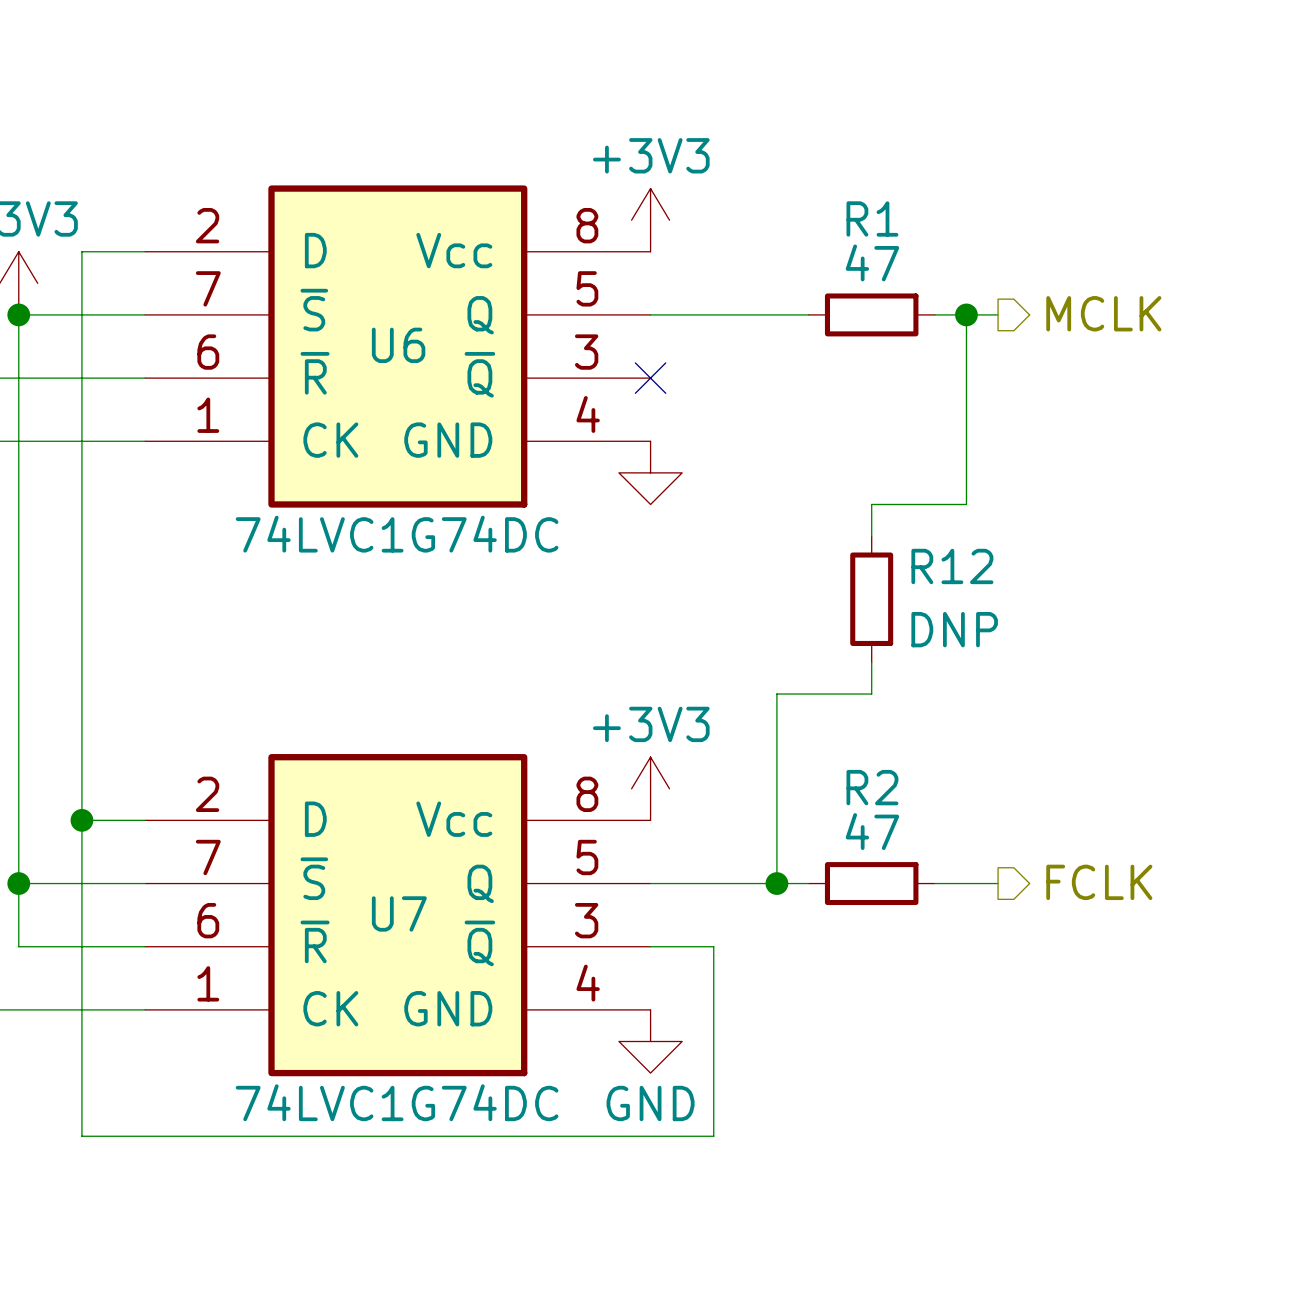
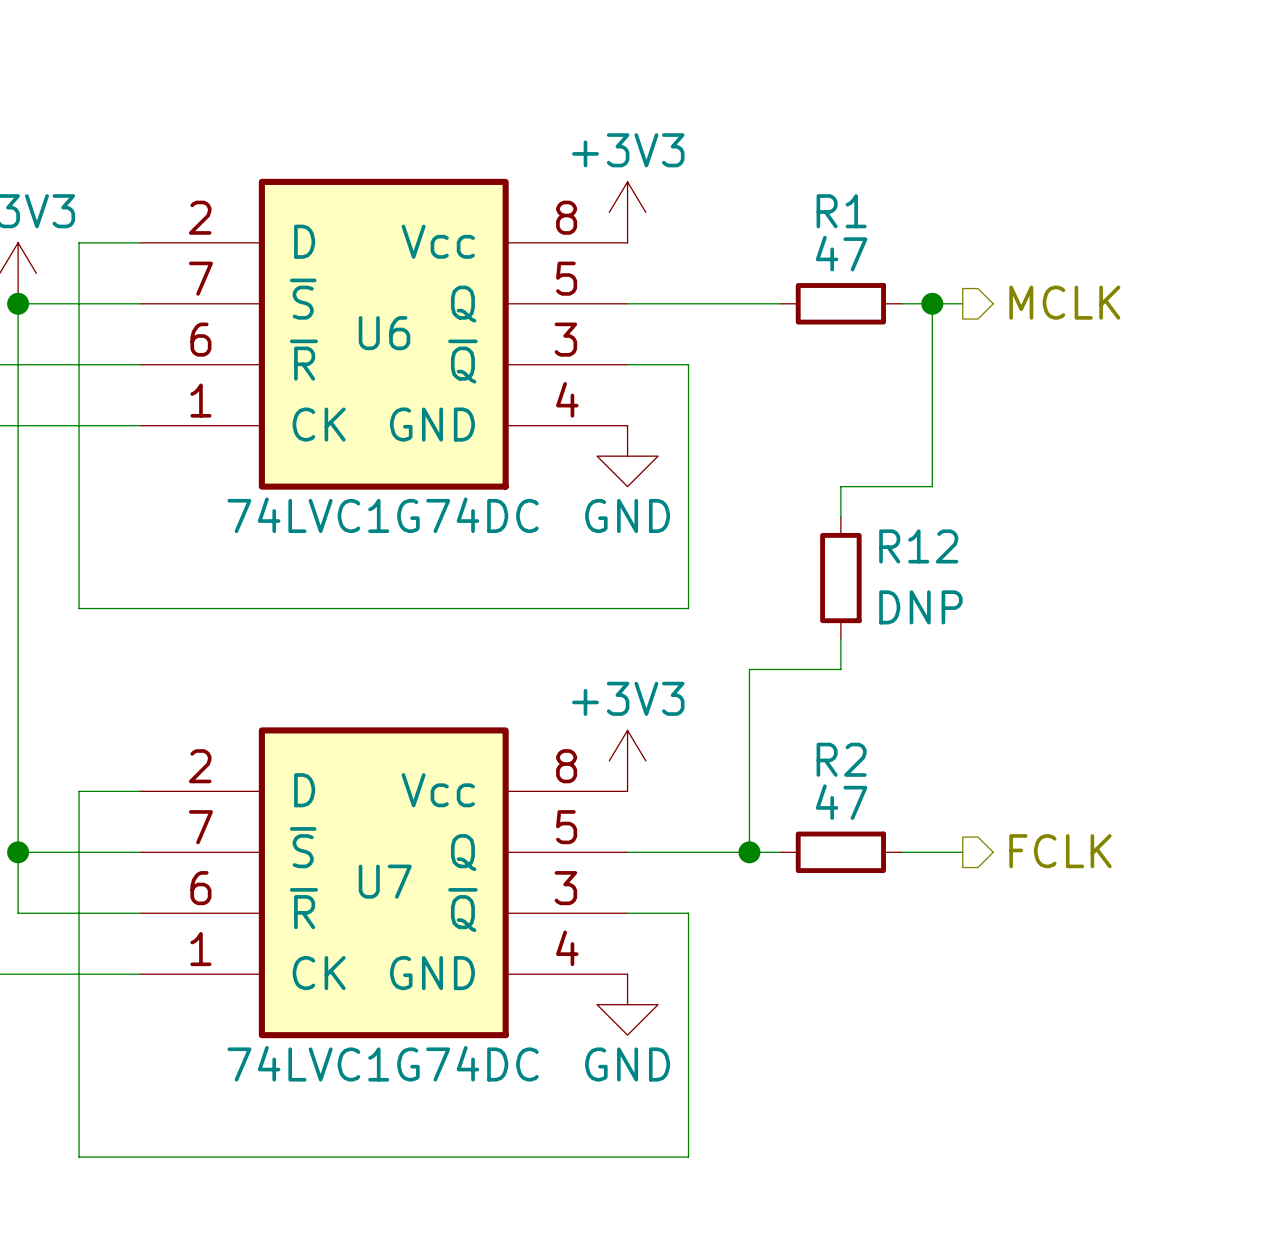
no-connect mark: (650, 378) -> none
power symbol text: none -> GND (627, 515)
wire: (81, 630) (81, 820) -> (79, 608) (688, 608) (688, 364) (627, 364)
junction: (81, 820) -> none
wire: (81, 1136) (713, 1136) -> (79, 1096) (79, 1157) (688, 1157) (688, 1096)

